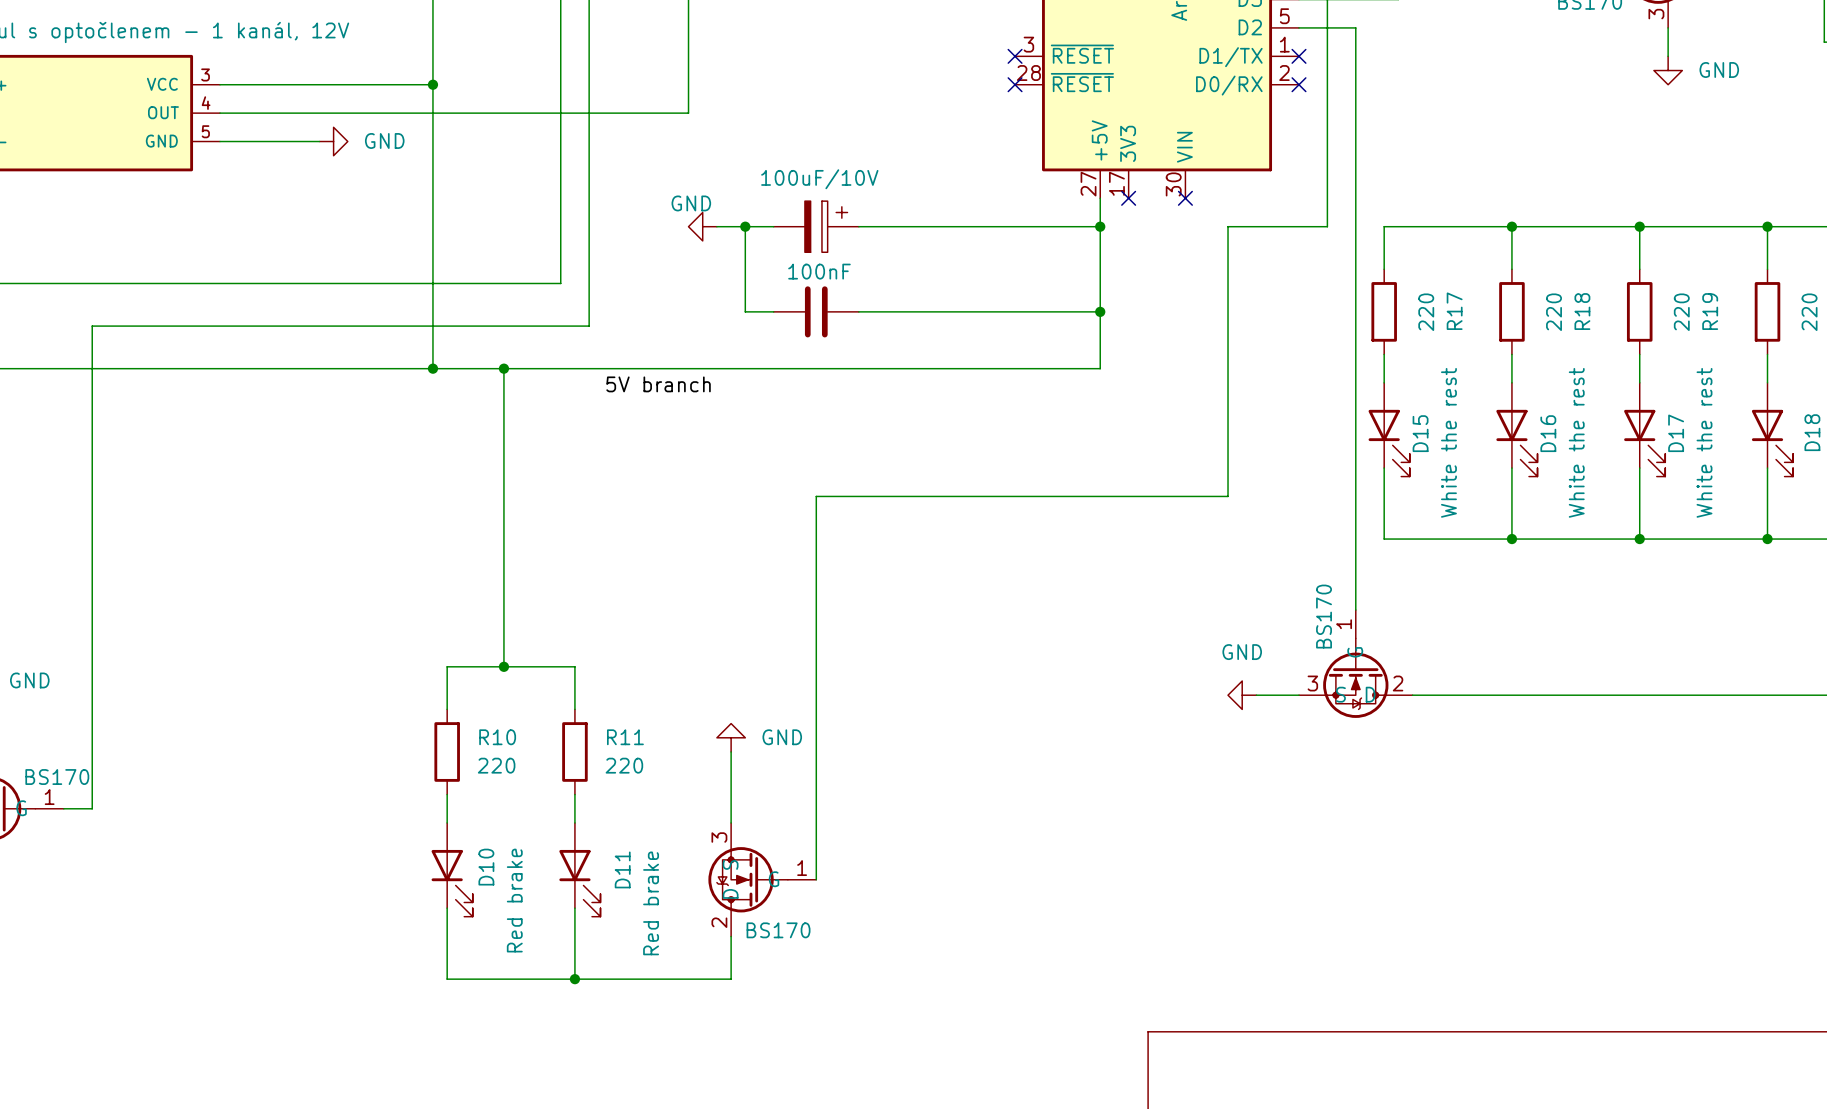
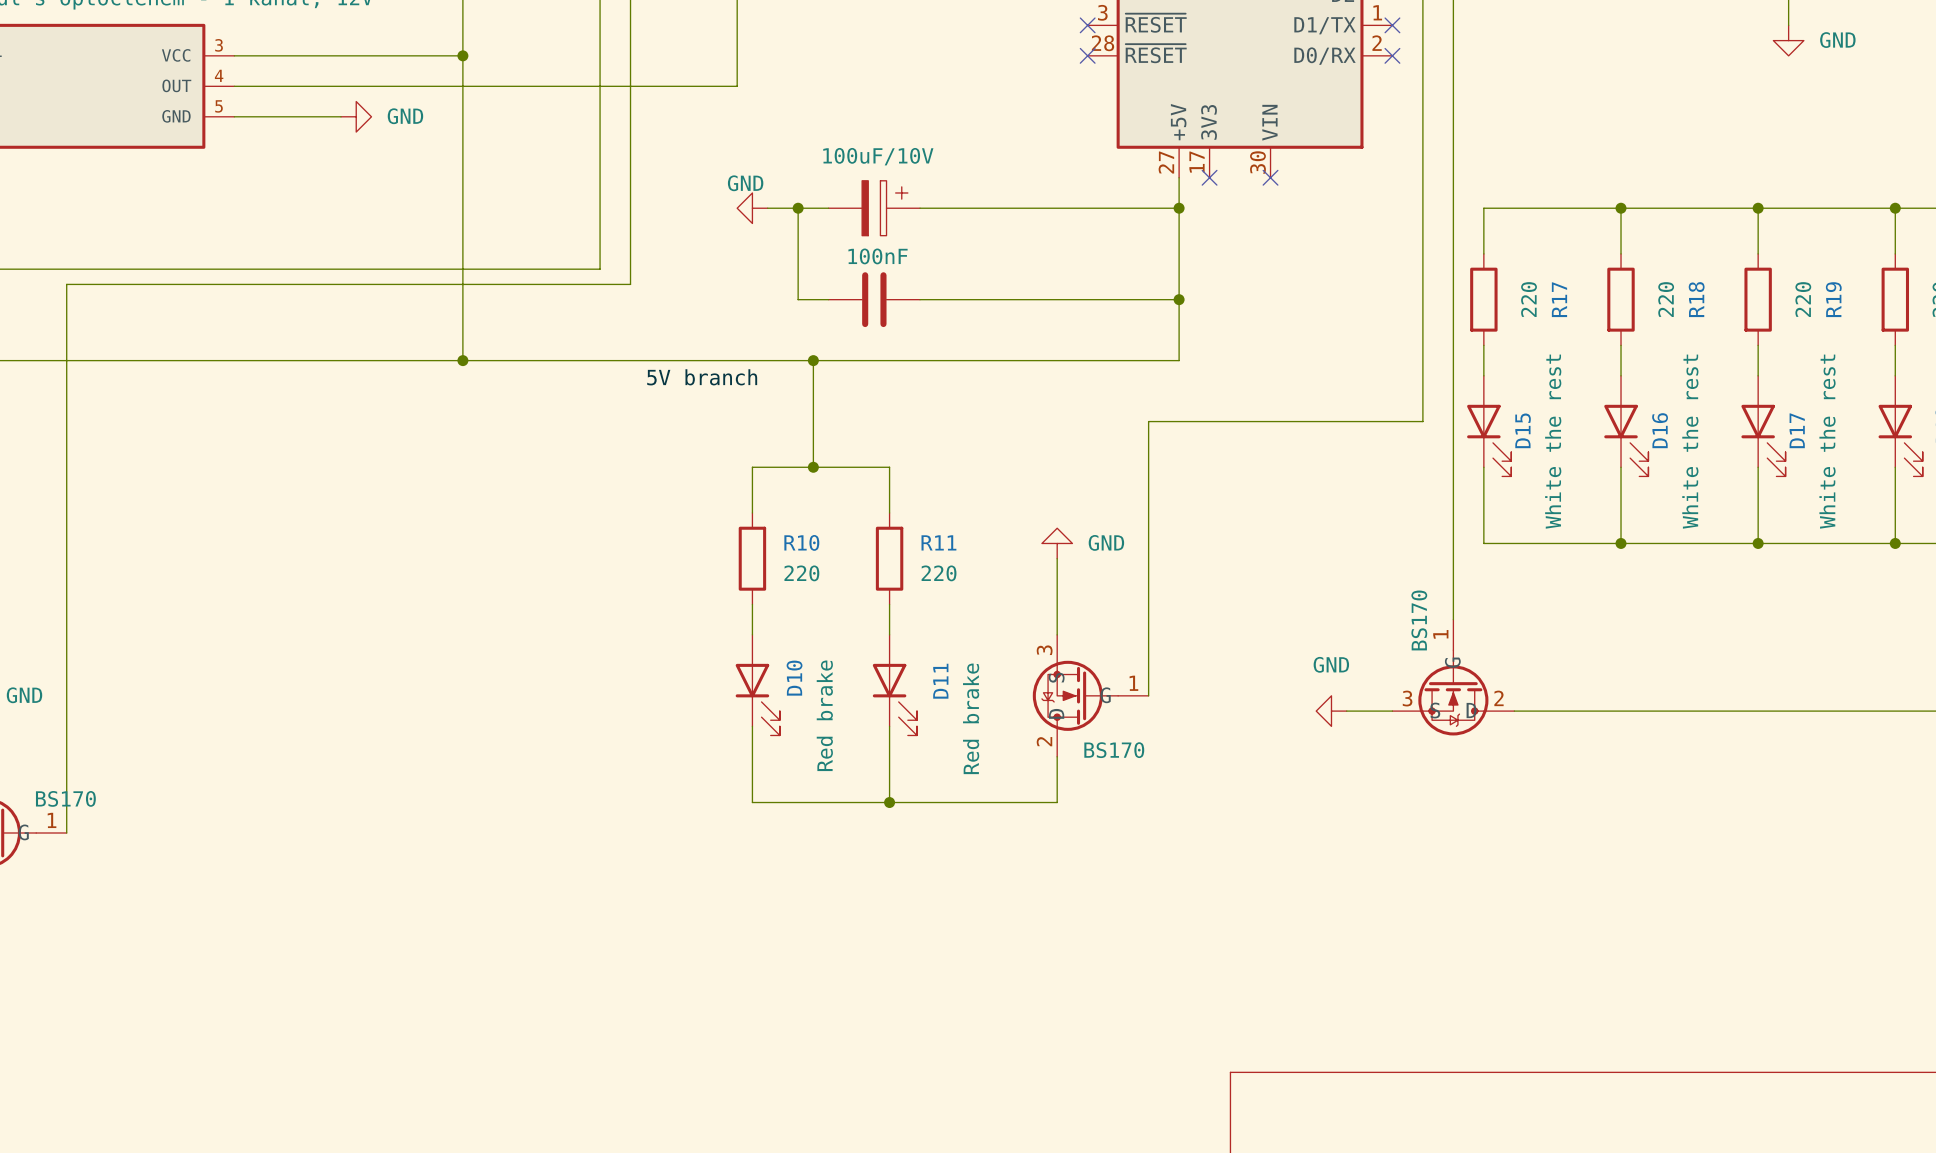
wire: (1327, 226) (1228, 226) (1228, 496) (816, 496) (816, 879) -> (1422, 208) (1422, 421) (1148, 421) (1148, 695)
wire: (589, 297) (589, 326) (92, 326) (92, 808) (63, 808) -> (630, 284) (66, 284) (66, 832)
wire: (503, 368) (503, 666) -> none
junction: (503, 368) -> none
wire: none -> (813, 360) (813, 467)
junction: none -> (813, 360)
junction: none -> (813, 467)
wire: none -> (752, 512) (752, 467) (889, 467) (889, 512)
power symbol: none -> GND (1057, 543)
wire: none -> (1057, 558) (1057, 634)
wire: none -> (889, 604) (889, 634)
junction: (503, 666) -> none
part: none -> BS170 (1090, 695)
wire: (447, 709) (447, 666) (574, 666) (574, 709) -> none
wire: none -> (752, 726) (752, 802) (1057, 802) (1057, 756)
power symbol: GND (731, 737) -> none
R10 position: (447, 751) -> (752, 558)
R11 position: (574, 751) -> (889, 558)
wire: (731, 751) (731, 822) -> (889, 726) (889, 802)
junction: none -> (889, 802)
wire: (447, 794) (447, 822) -> none
wire: (574, 794) (574, 822) -> (752, 604) (752, 634)
D10 position: (452, 869) -> (757, 685)
D11 position: (579, 869) -> (894, 685)
part: BS170 (762, 879) -> none
wire: (447, 908) (447, 979) (731, 979) (731, 936) -> none
wire: (574, 908) (574, 979) -> none
junction: (574, 979) -> none

